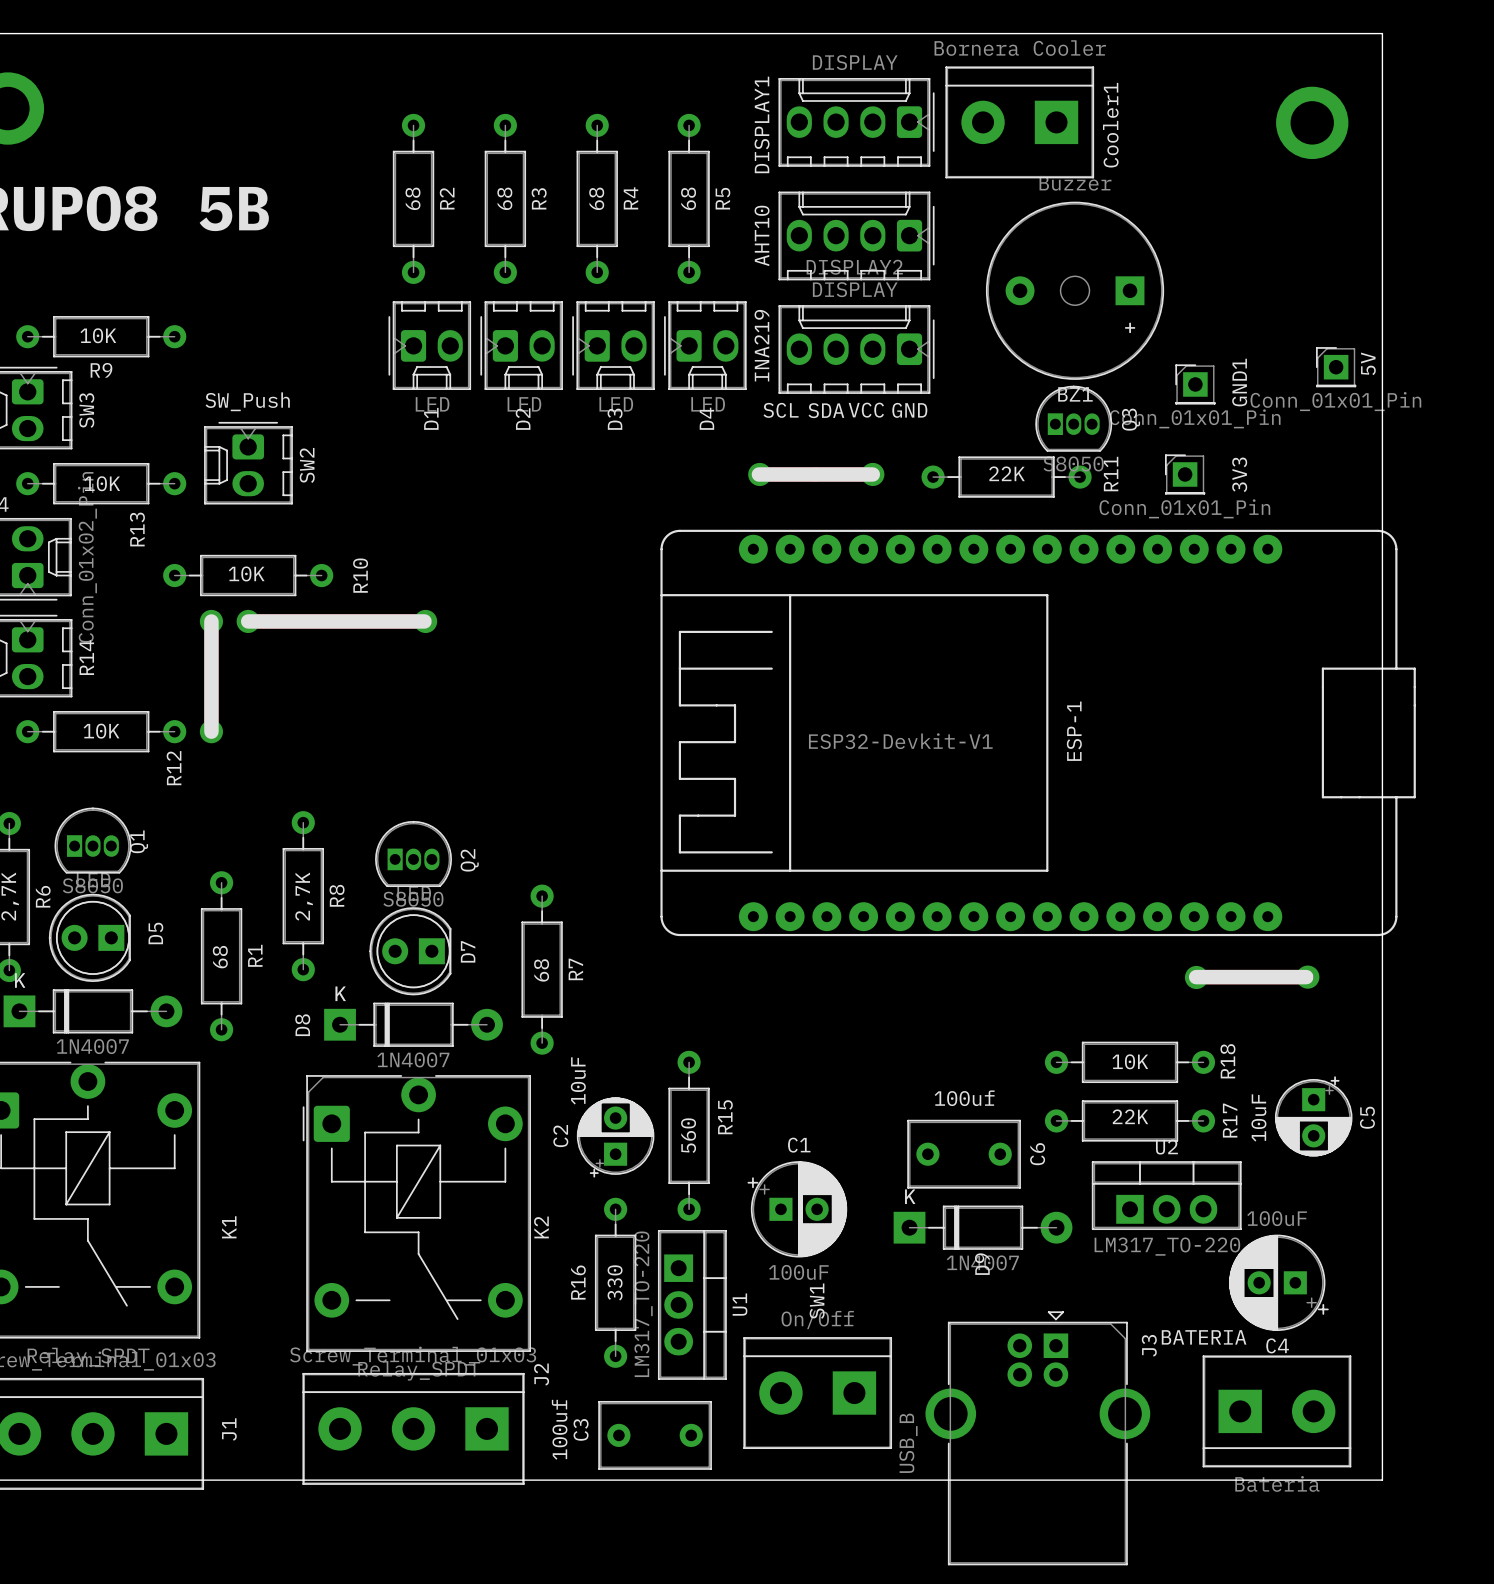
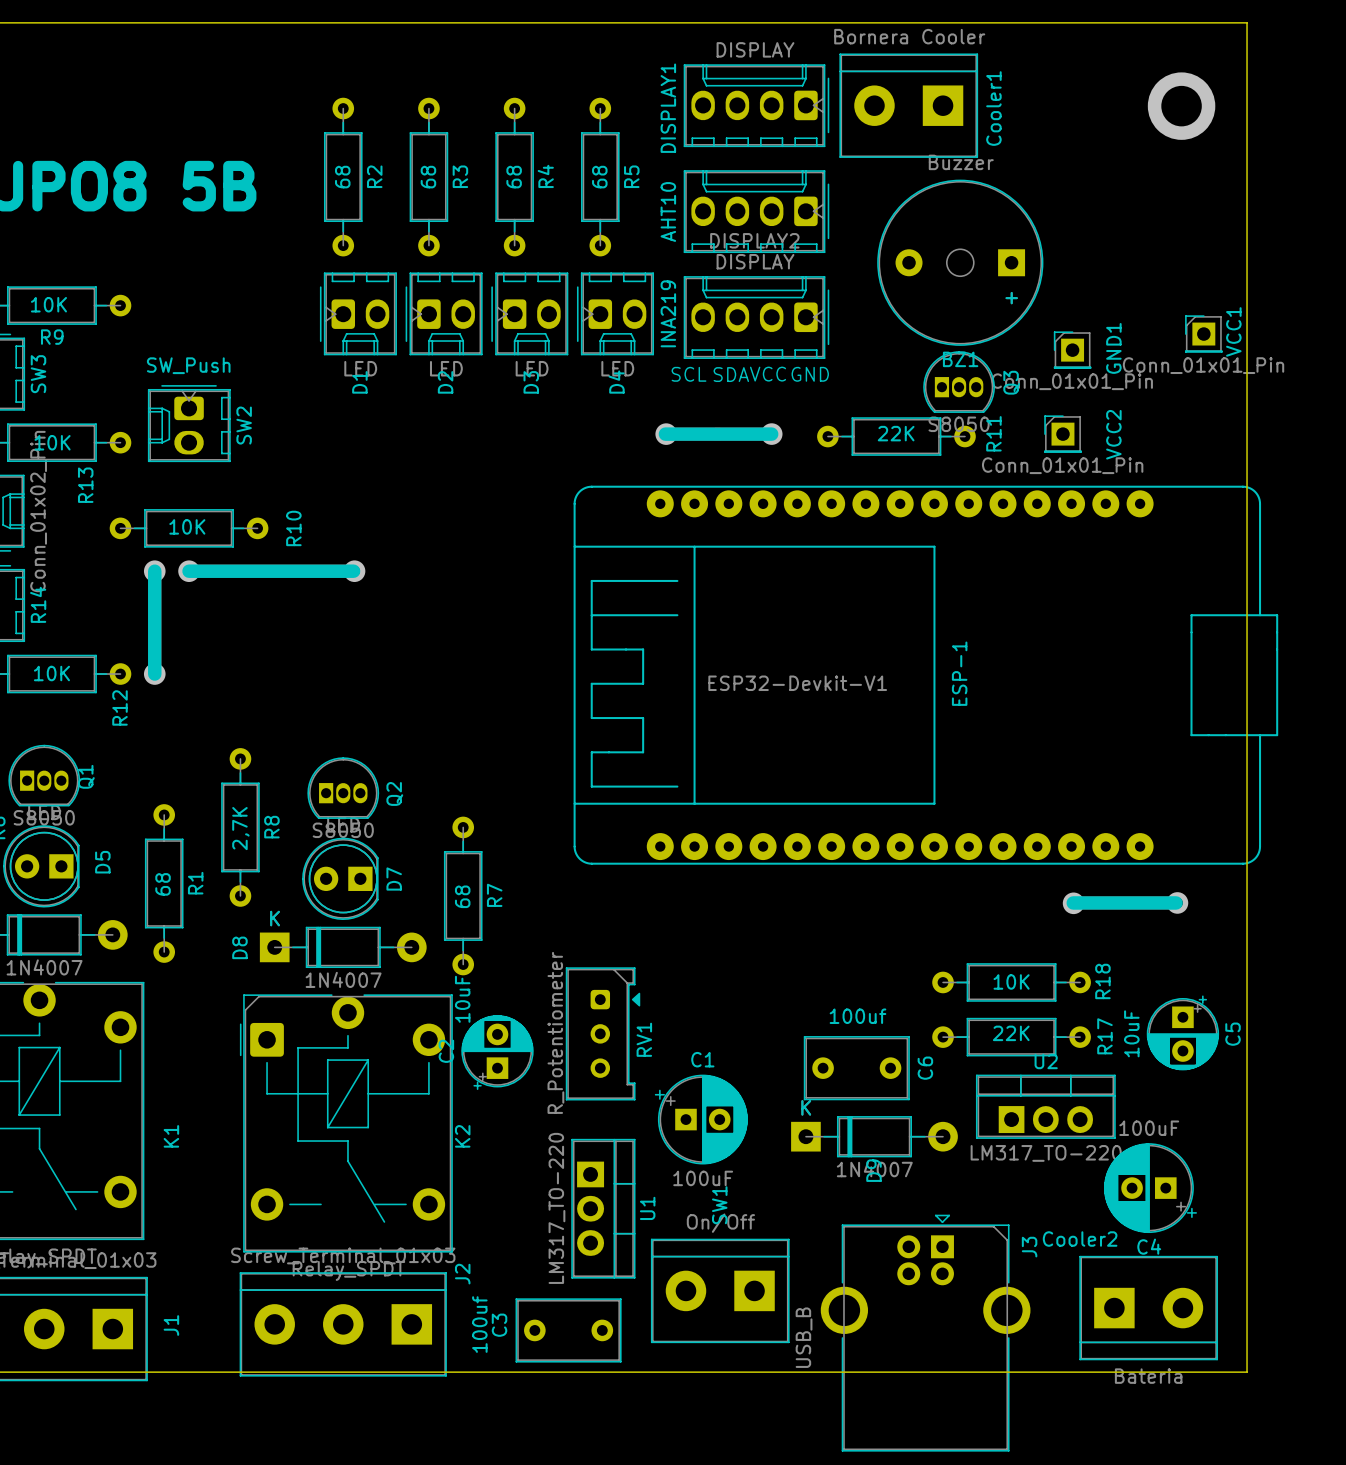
5V name: 5V (1368, 363) -> VCC1 (1233, 331)
3V3 name: 3V3 (1239, 474) -> VCC2 (1113, 434)
RV1: none -> R_Potentiometer (603, 1033)
R15: 560 (689, 1135) -> none
C2 position: (615, 1137) -> (497, 1052)
R16: 330 (615, 1282) -> none
BATERIA name: BATERIA (1204, 1337) -> Cooler2 (1080, 1239)

